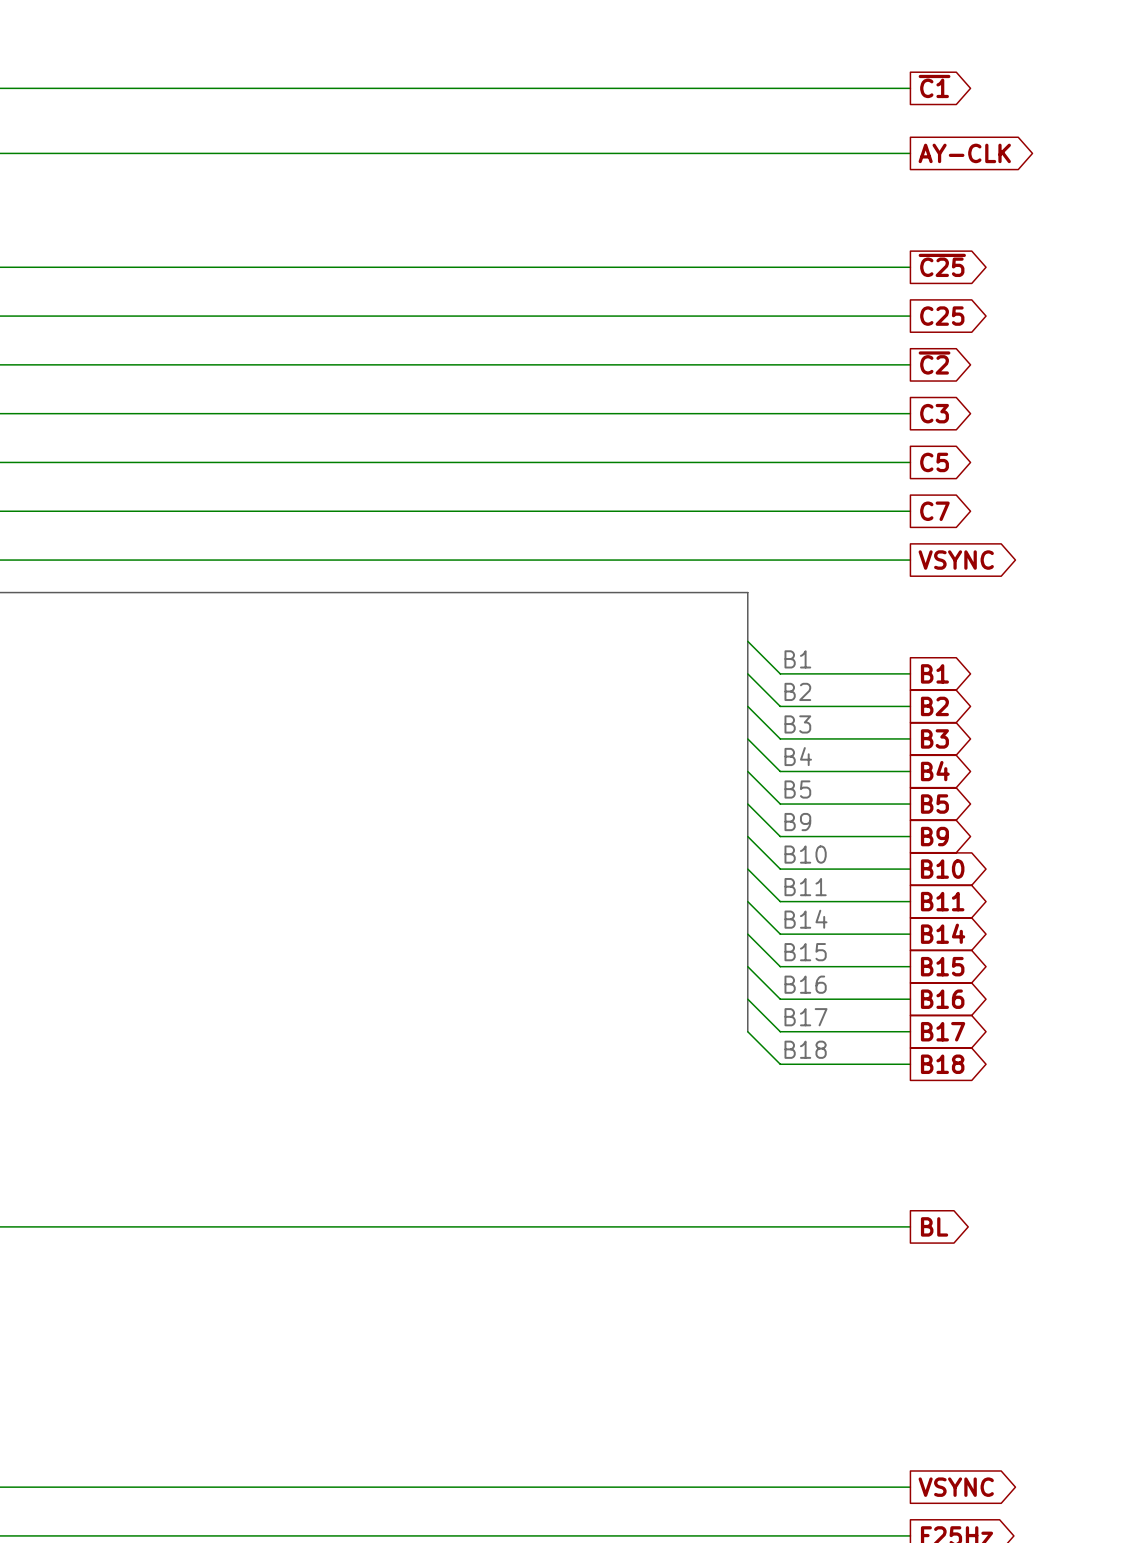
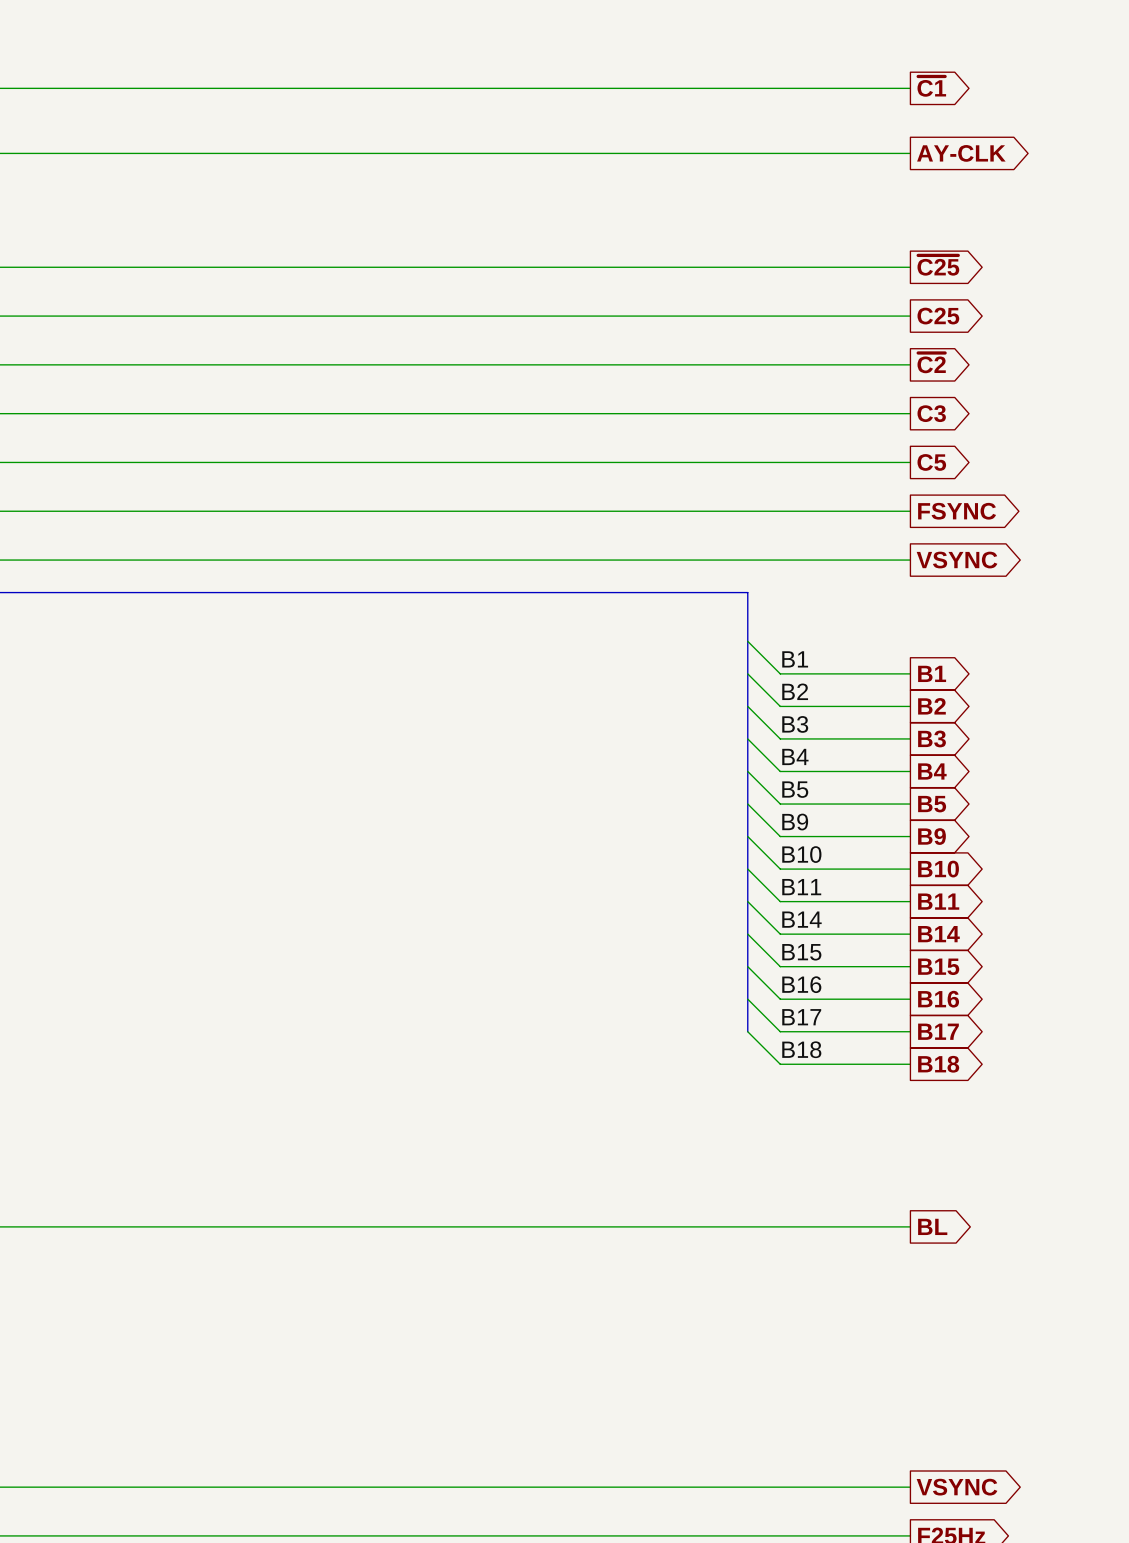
global label: C7 (934, 511) -> FSYNC (957, 511)

